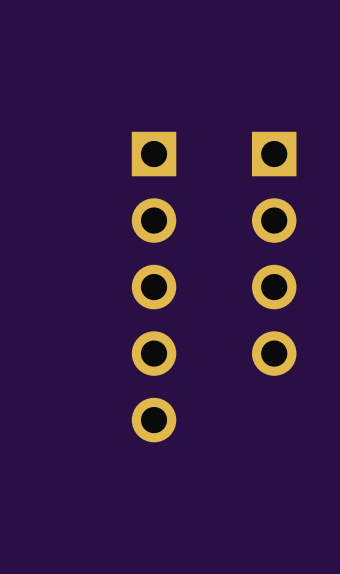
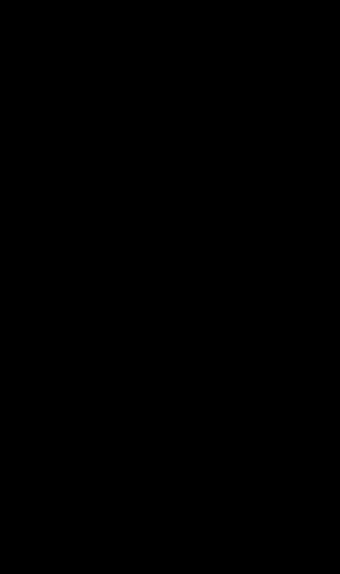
part: (274, 253) -> none
part: (154, 287) -> none

